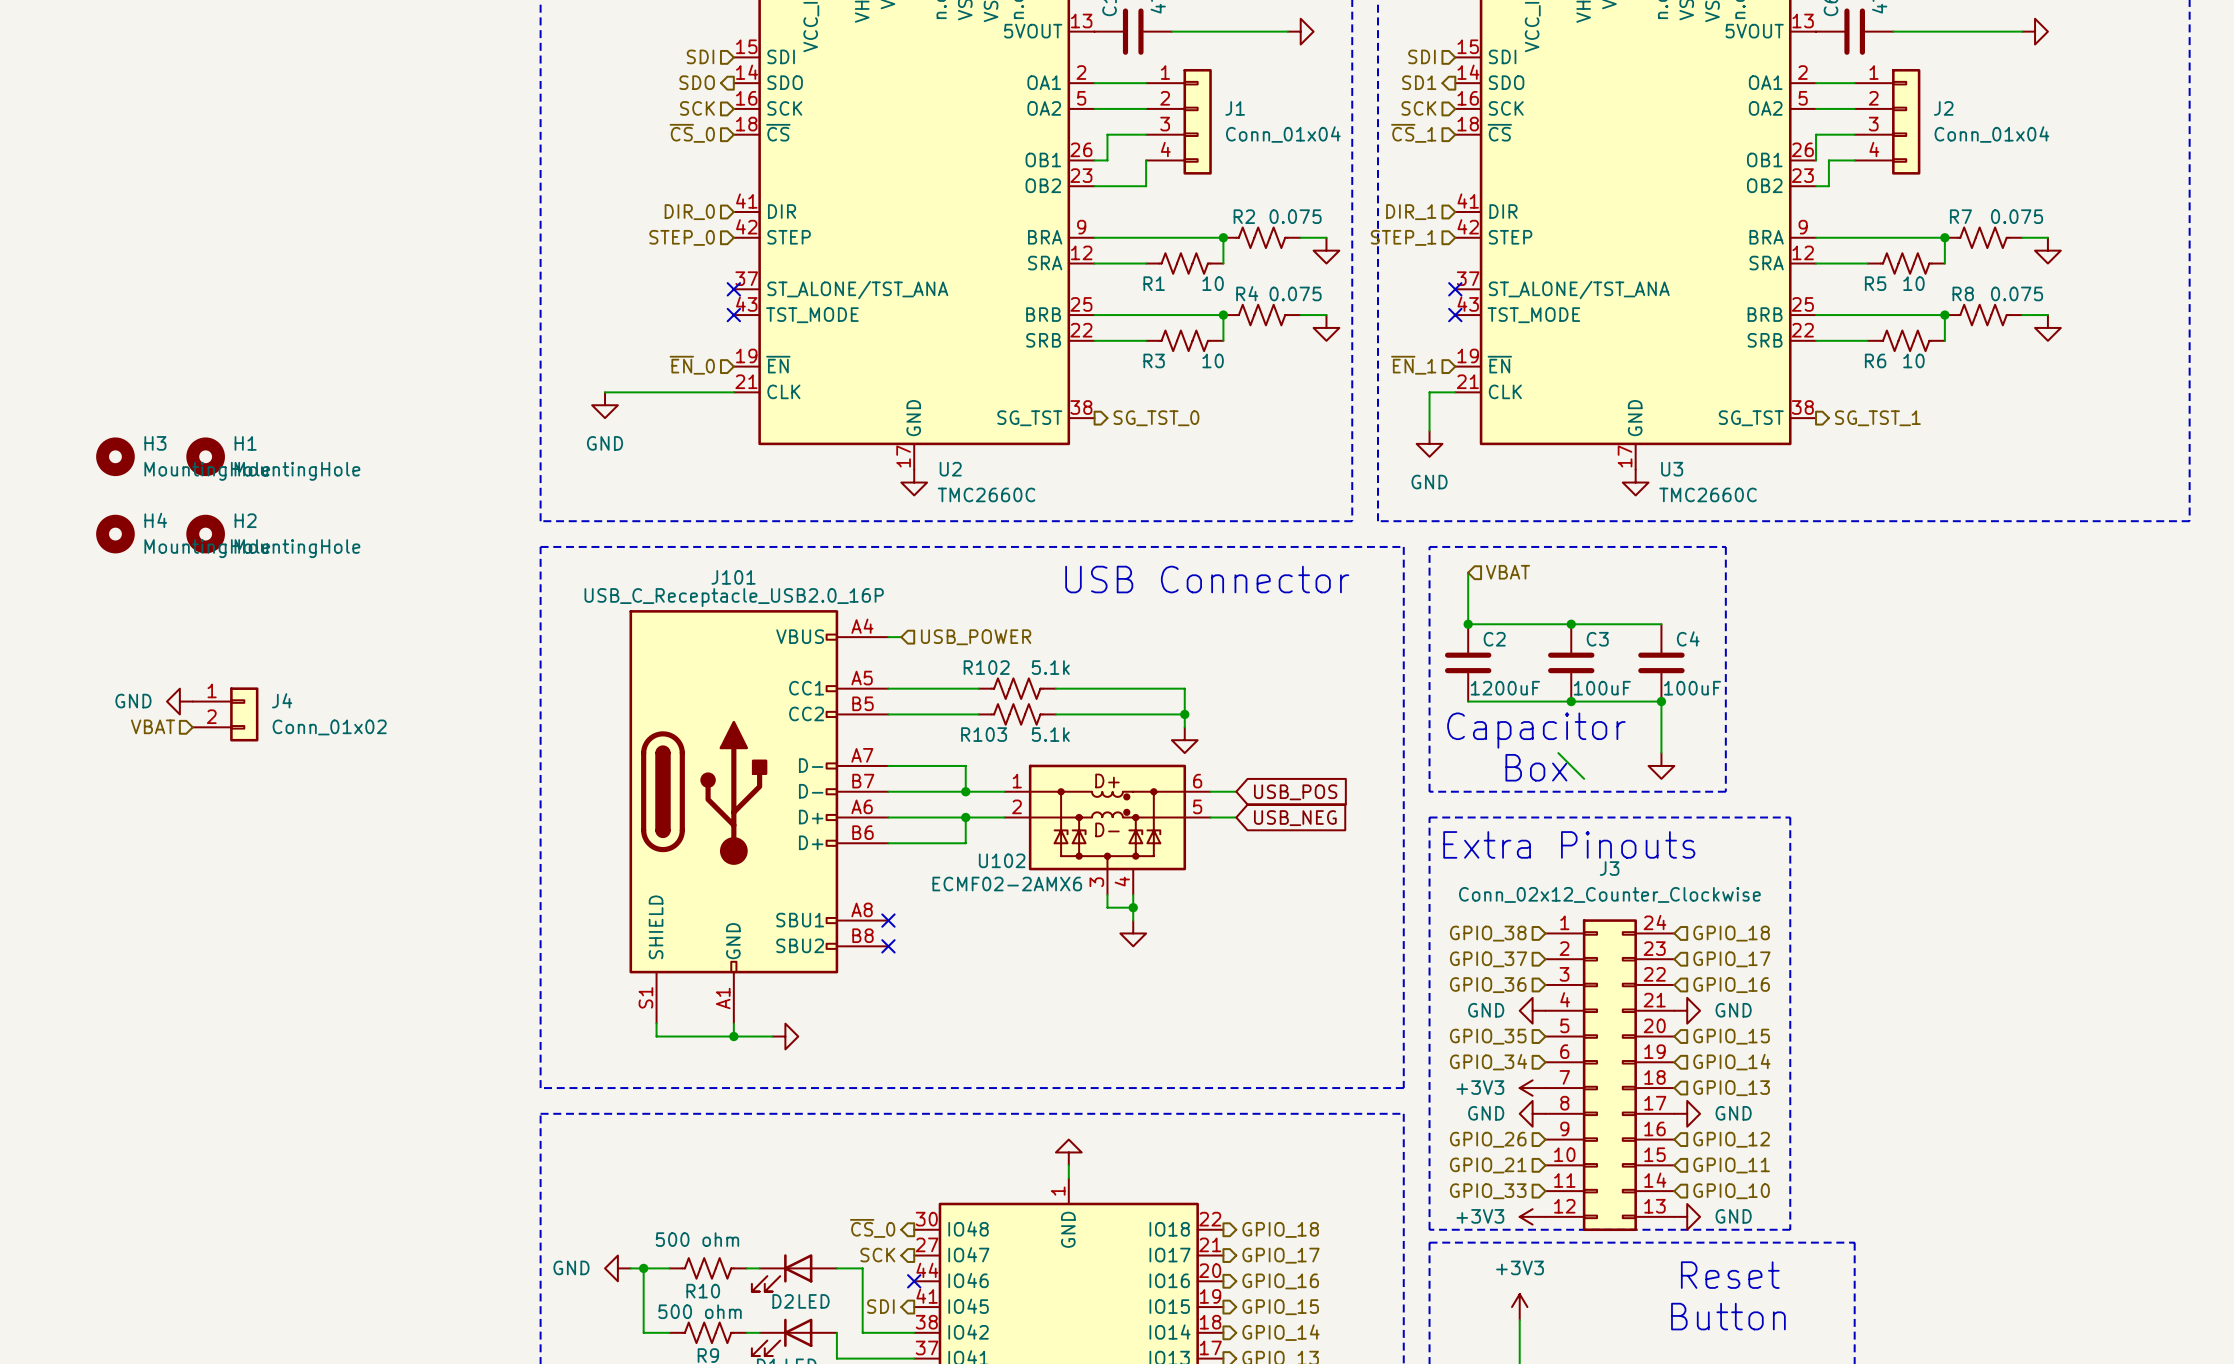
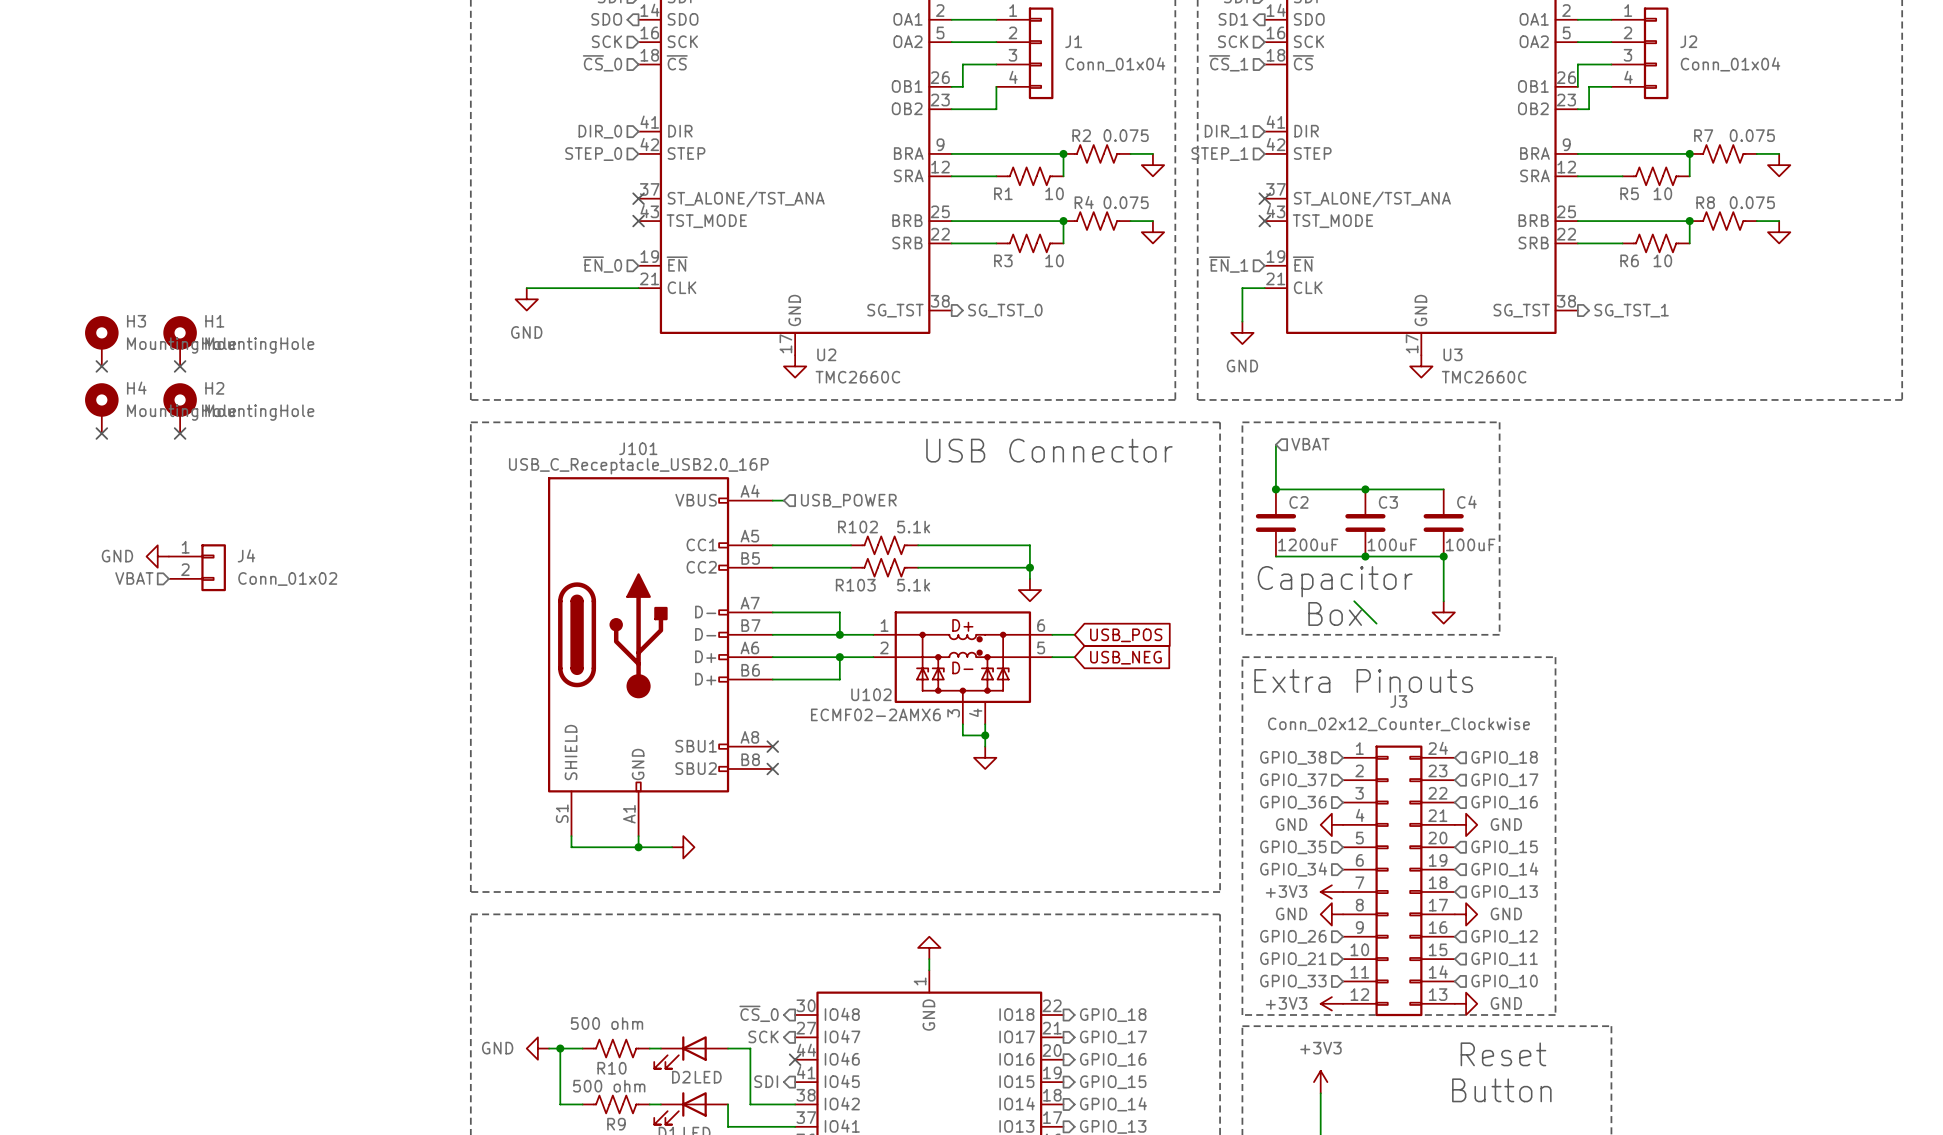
H3 symbol: [96, 437, 135, 477] -> [85, 316, 119, 367]
H1 symbol: [186, 437, 225, 477] -> [163, 316, 197, 367]
no-connect mark: none -> (101, 366)
no-connect mark: none -> (180, 366)
H4 symbol: [96, 514, 135, 554] -> [85, 383, 119, 434]
H2 symbol: [186, 514, 225, 554] -> [163, 383, 197, 434]
no-connect mark: none -> (101, 433)
no-connect mark: none -> (180, 433)

